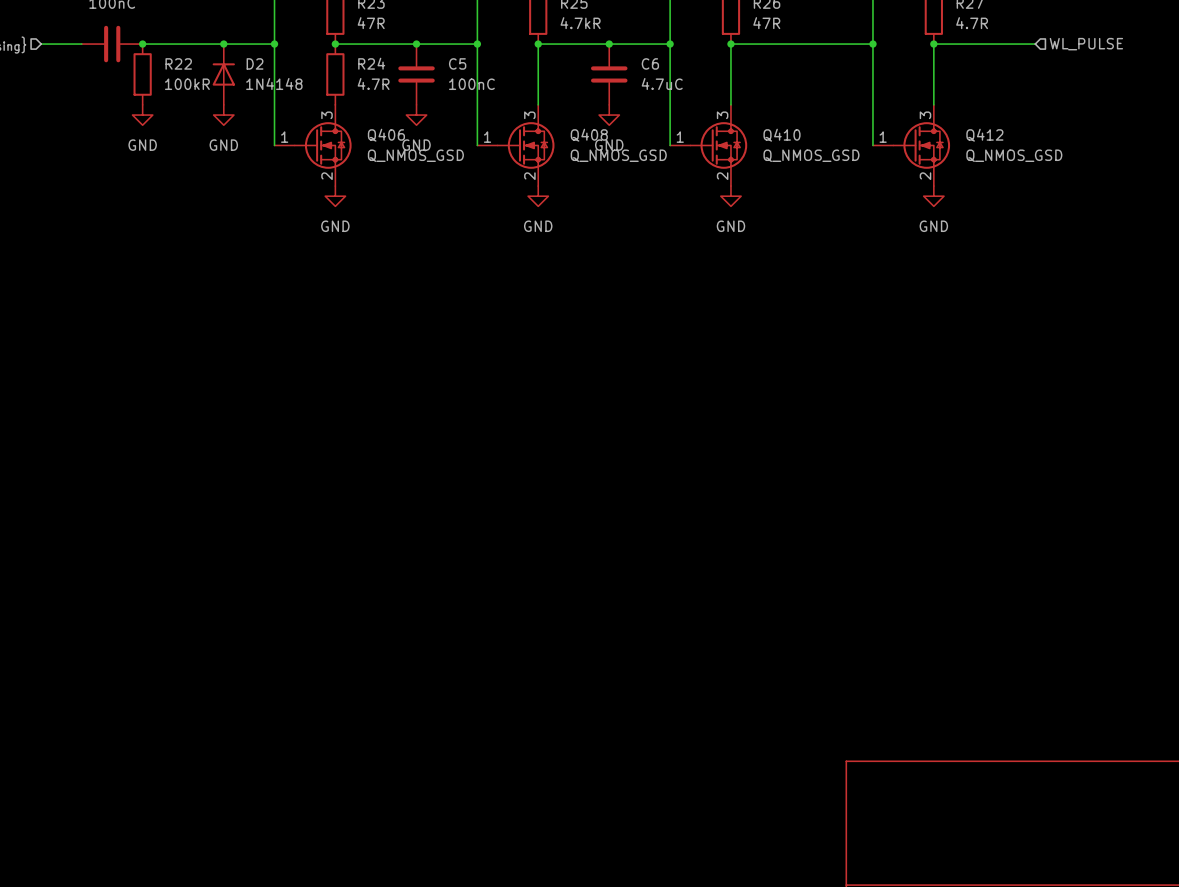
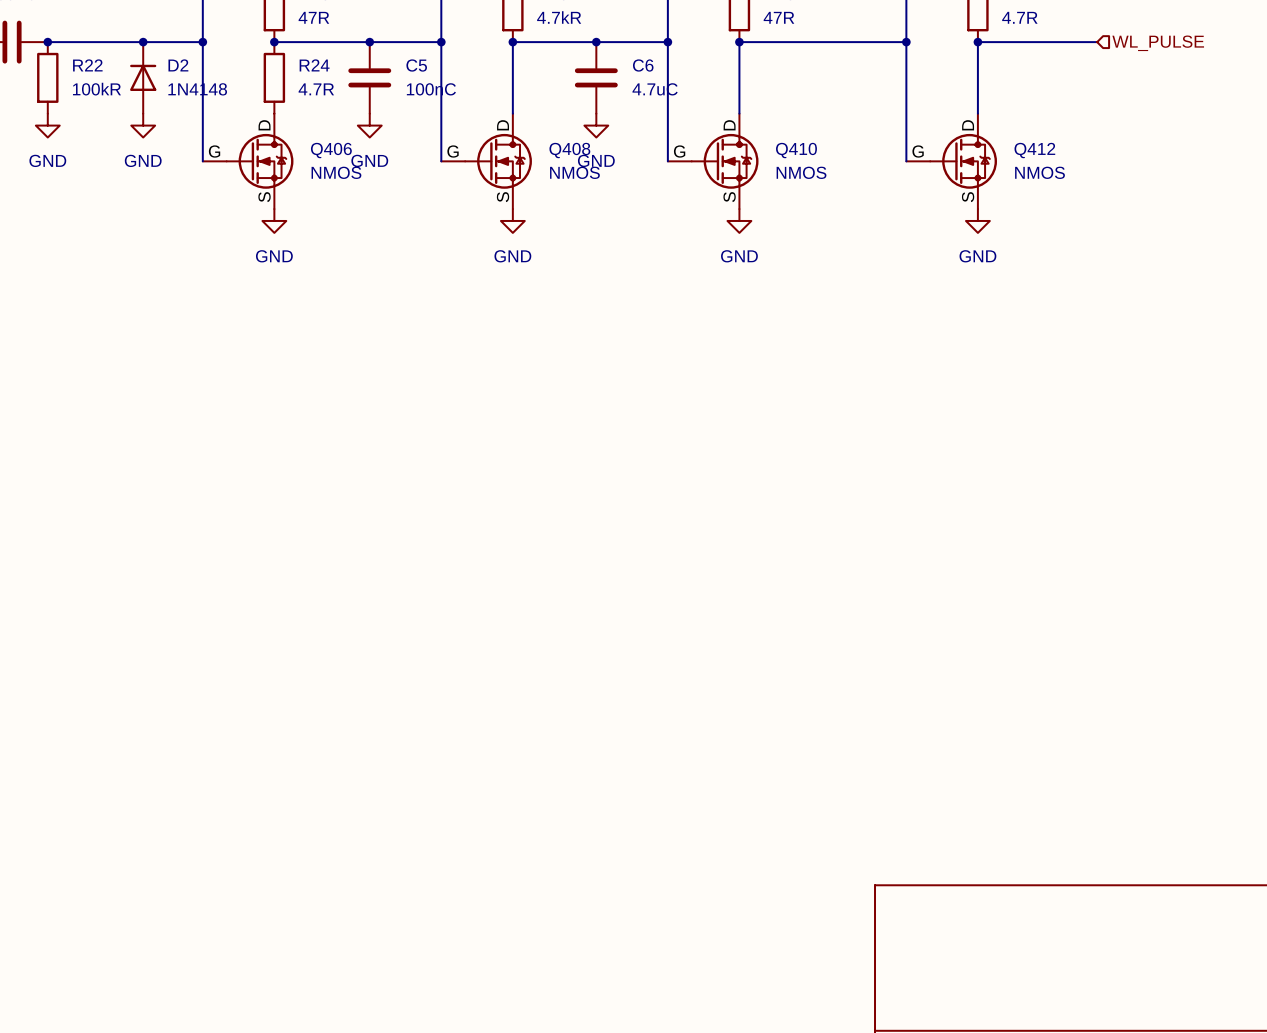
Q406 symbol: [274, 104, 352, 187] -> [202, 113, 294, 210]
Q408 symbol: [477, 104, 555, 187] -> [441, 113, 532, 210]
Q410 symbol: [670, 104, 748, 187] -> [667, 113, 759, 210]
Q412 symbol: [872, 104, 951, 187] -> [906, 113, 997, 210]
Q406 value: Q_NMOS_GSD (415, 155) -> NMOS (336, 172)
Q408 value: Q_NMOS_GSD (618, 155) -> NMOS (574, 172)
Q410 value: Q_NMOS_GSD (811, 155) -> NMOS (801, 172)
Q412 value: Q_NMOS_GSD (1014, 155) -> NMOS (1040, 172)

